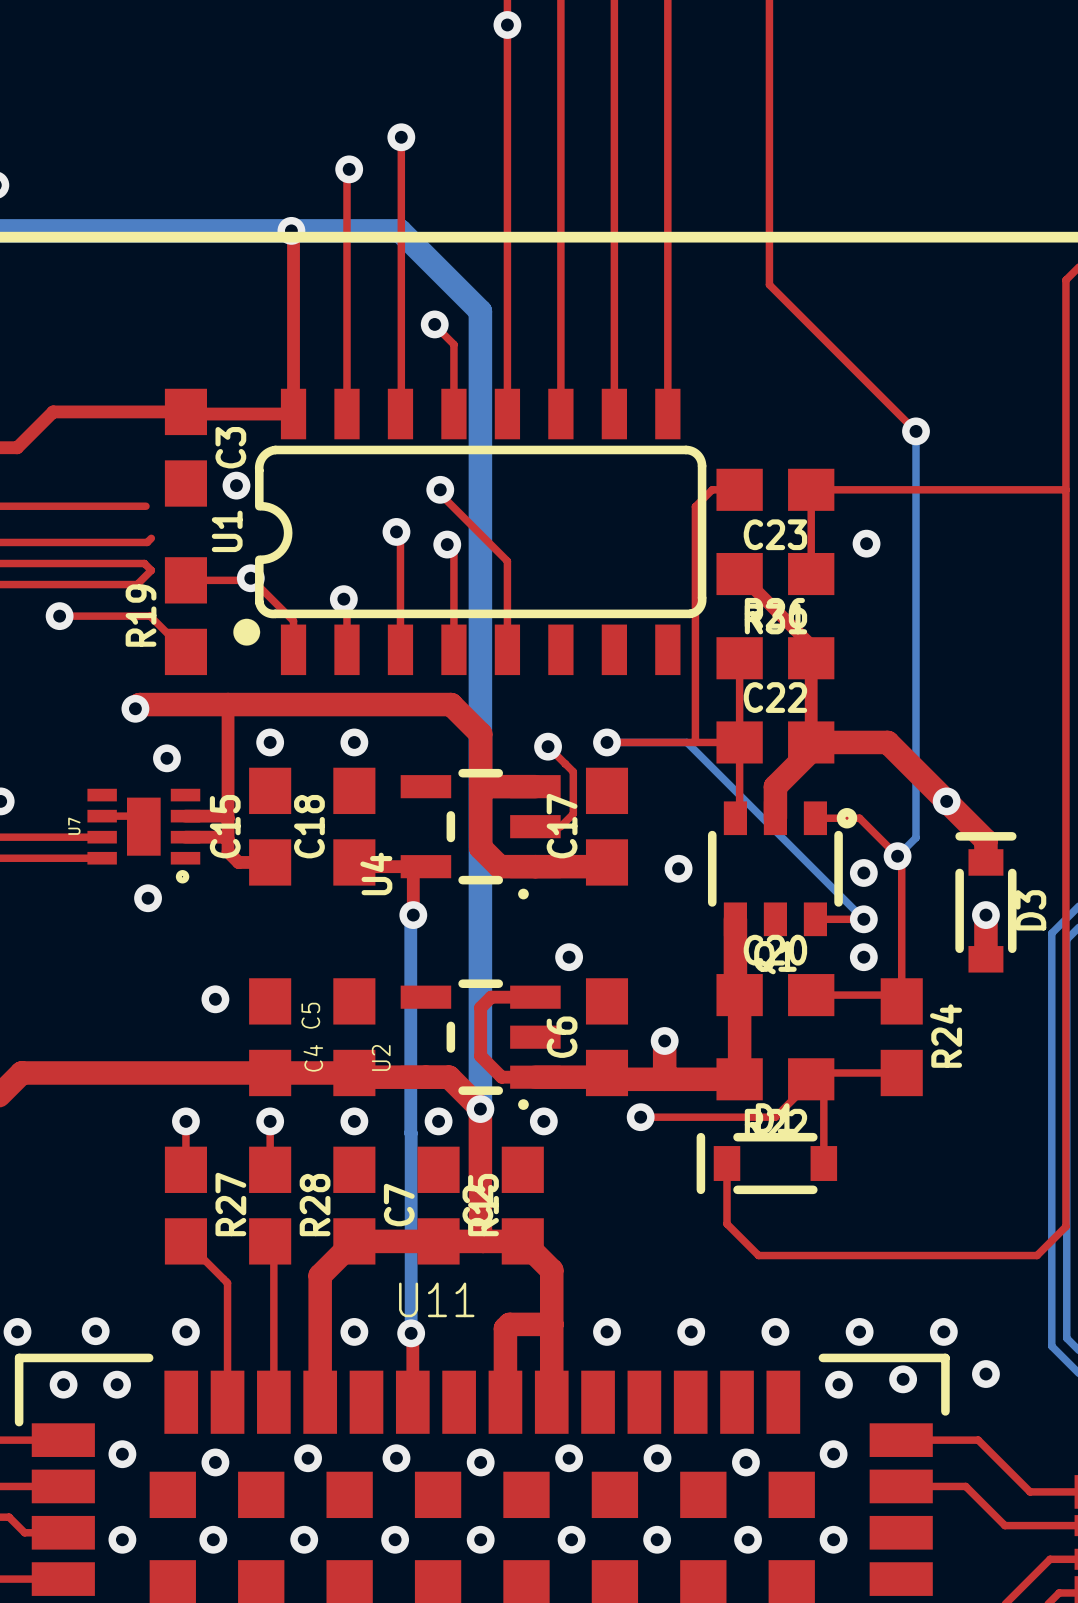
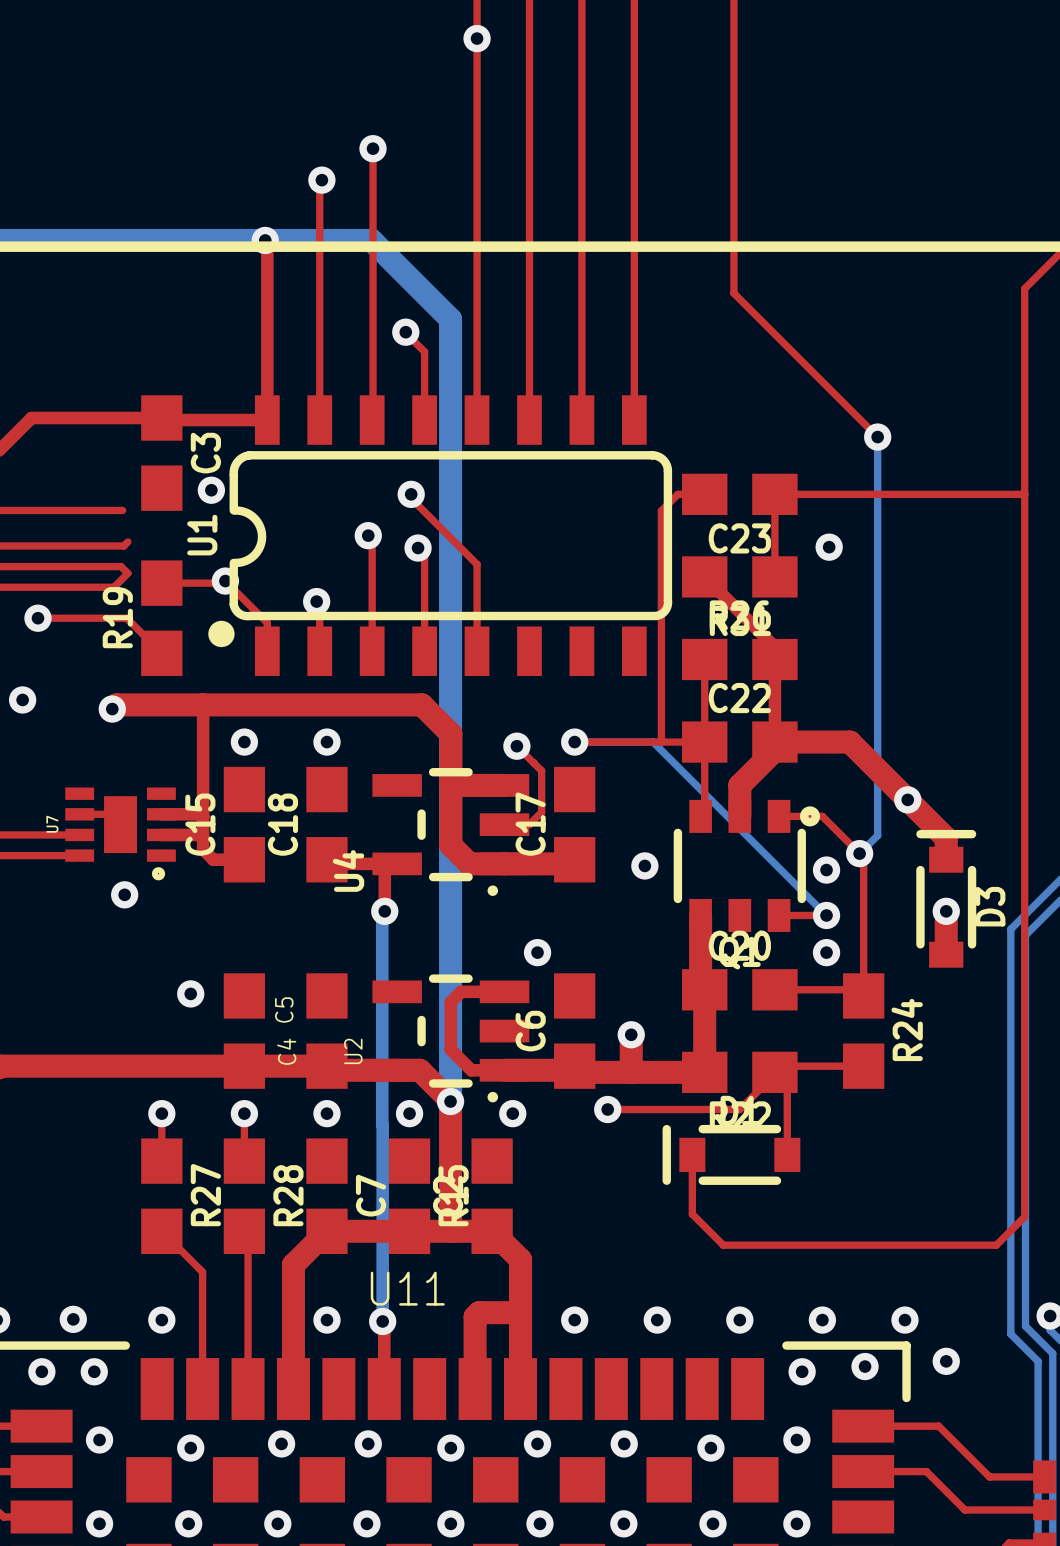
via: none -> (22, 699)
via: (166, 758) -> none

